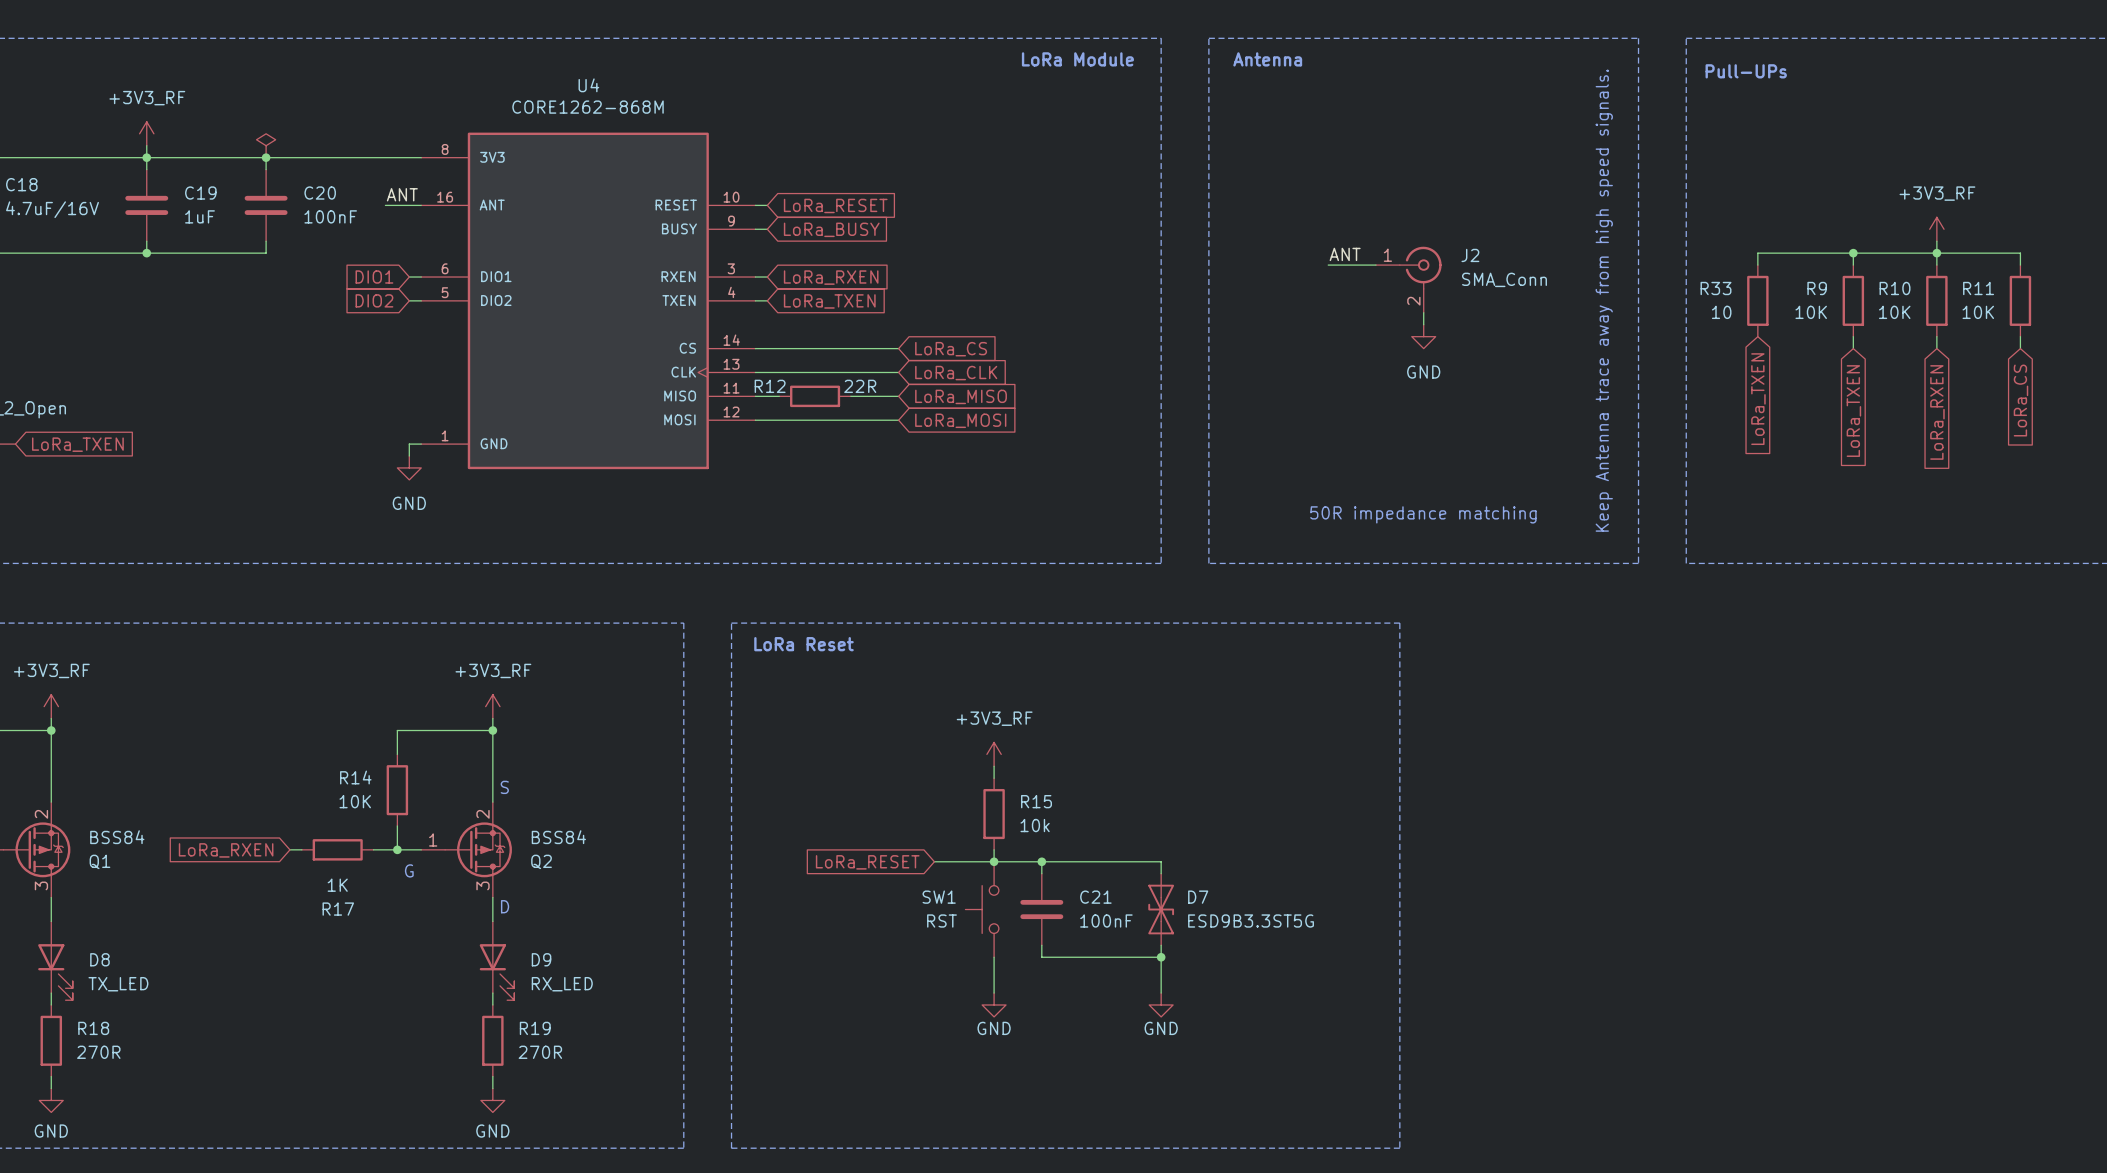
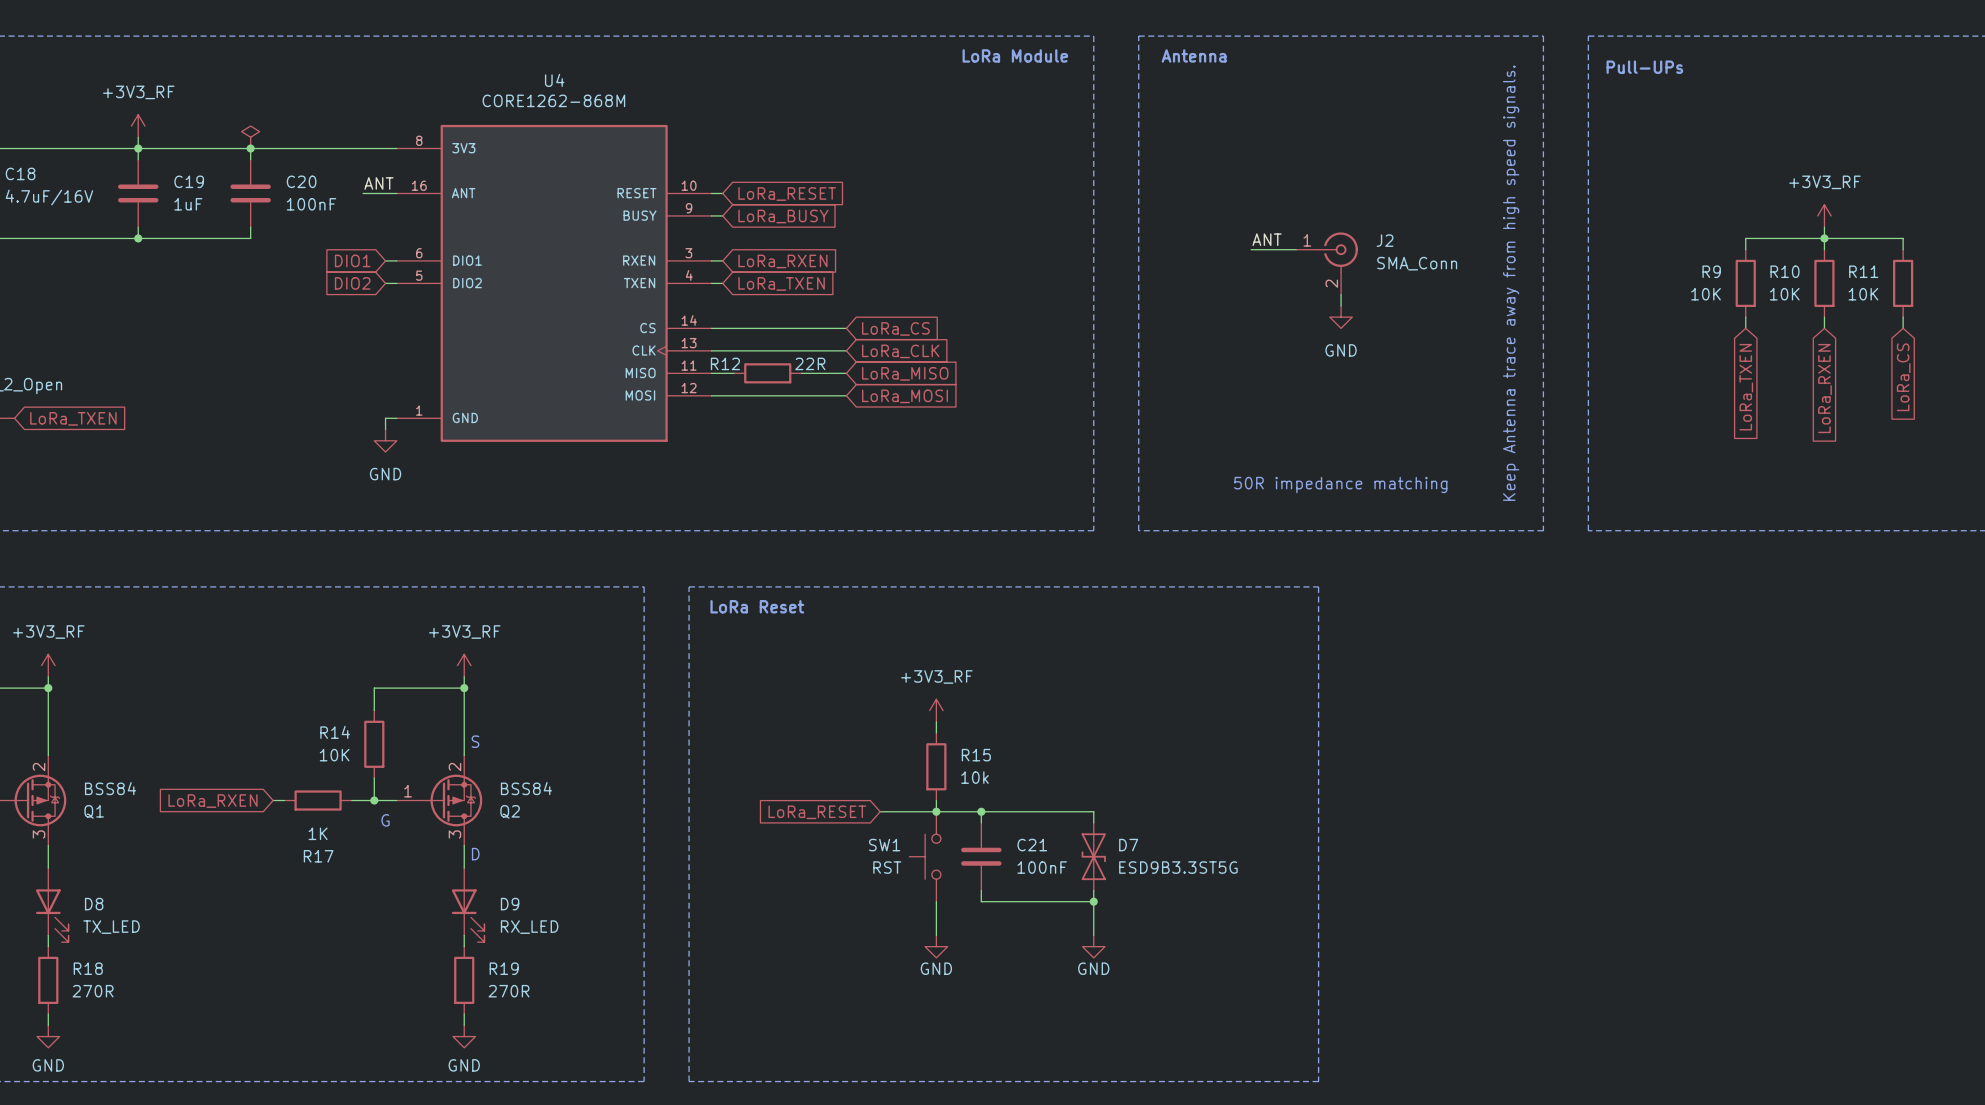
wire: (1853, 253) (1757, 253) (1757, 265) -> none
junction: (1853, 253) -> none
R33: 10 (1757, 300) -> none
global label: LoRa_TXEN (1758, 399) -> none

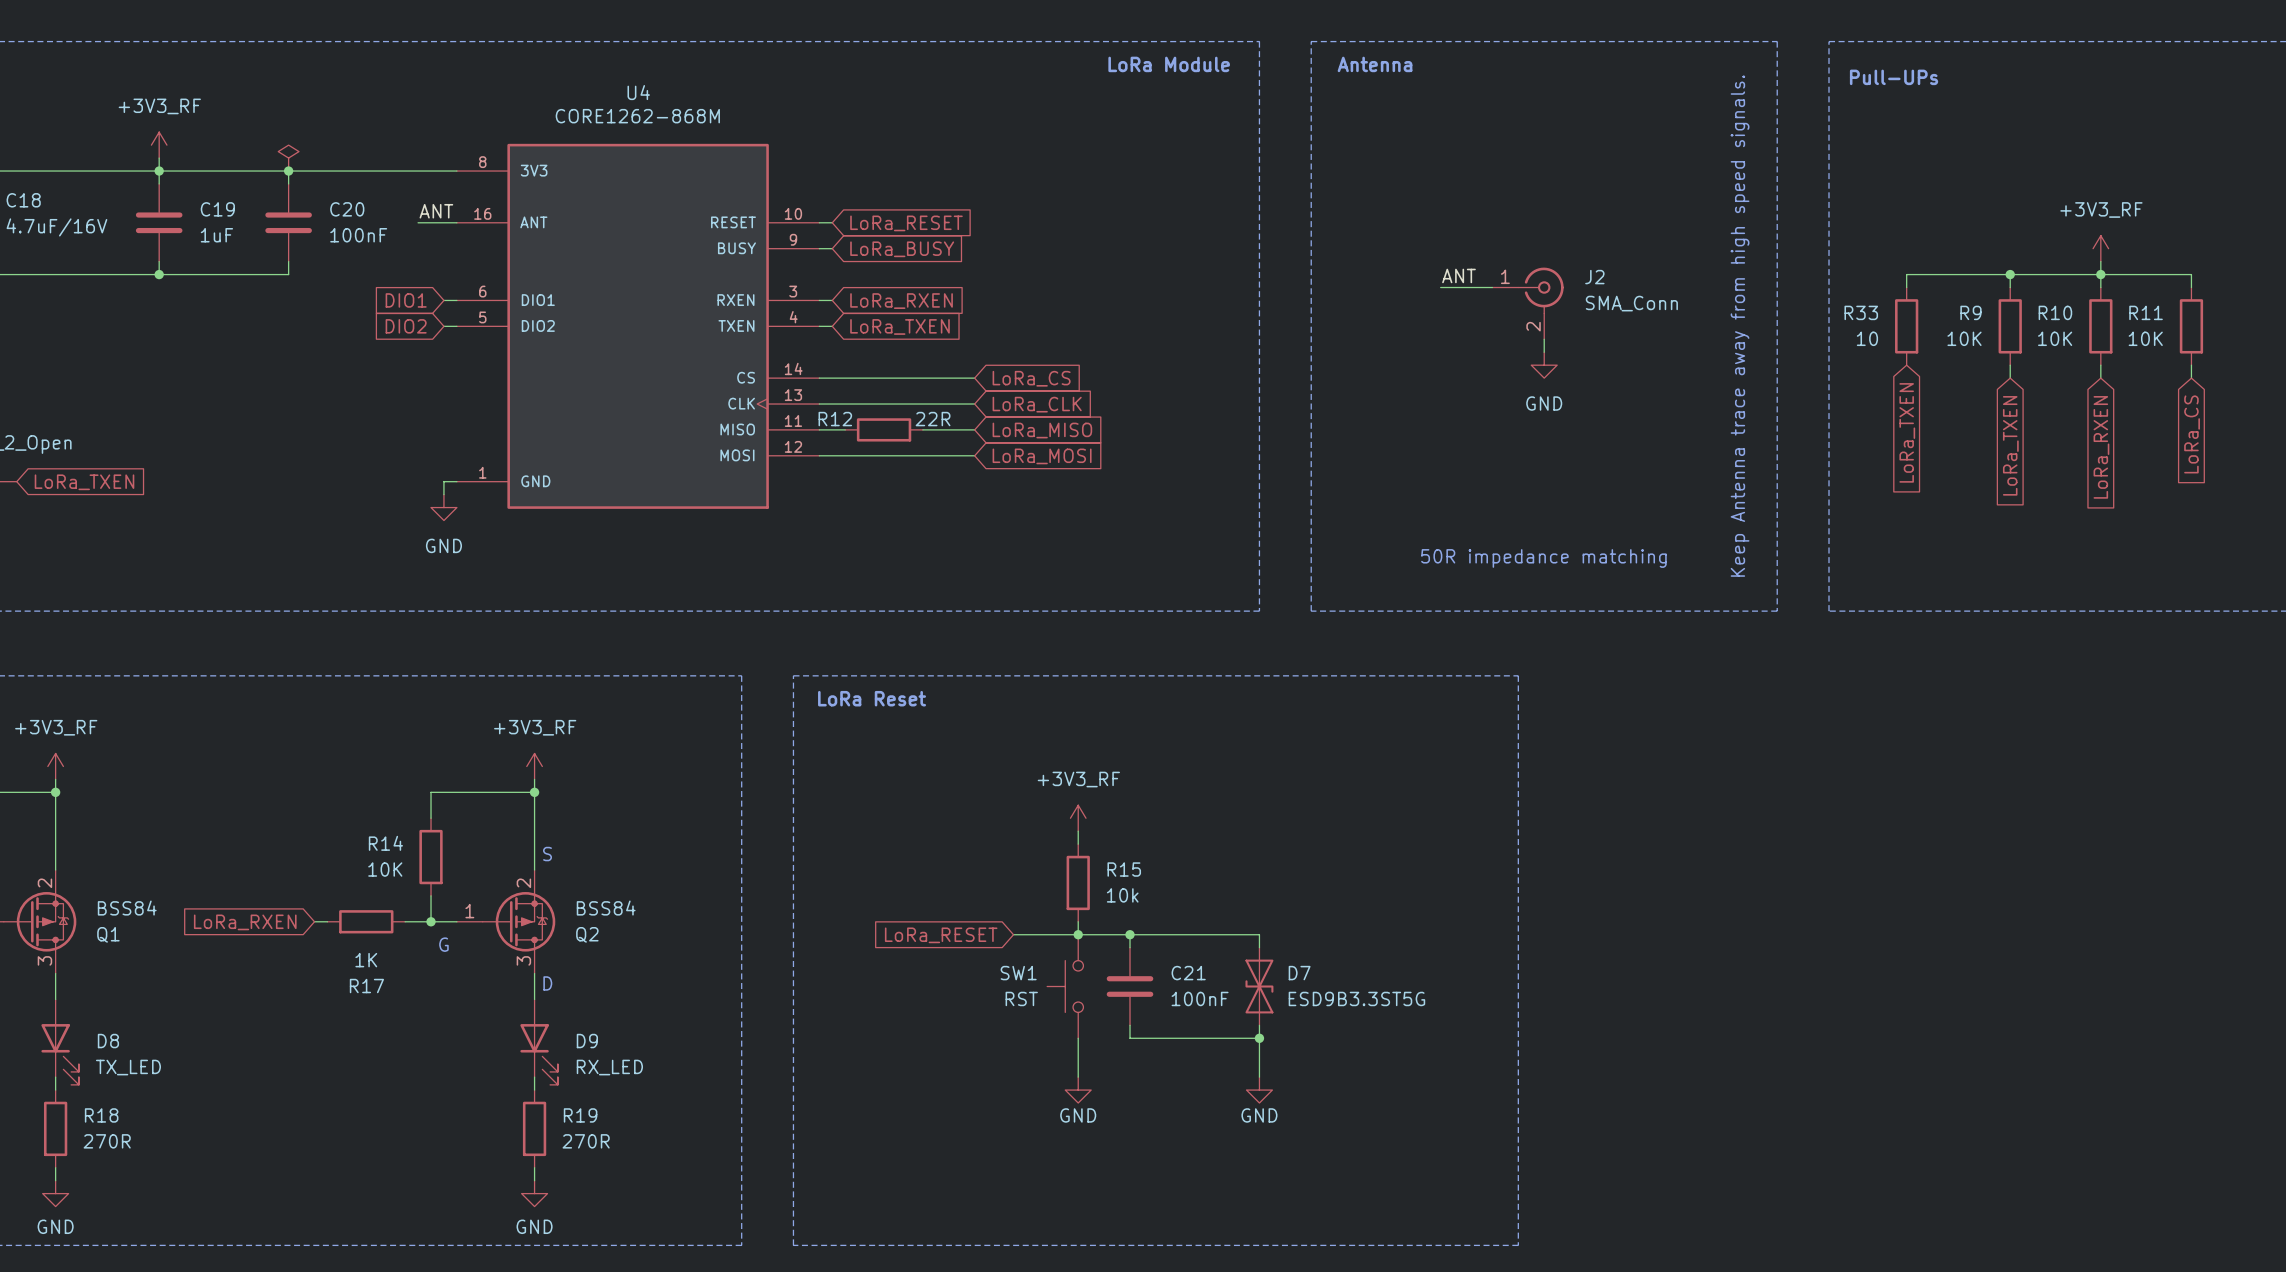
wire: none -> (2010, 274) (1906, 274) (1906, 287)
junction: none -> (2010, 274)
R33: none -> 10 (1906, 326)
global label: none -> LoRa_TXEN (1907, 432)

